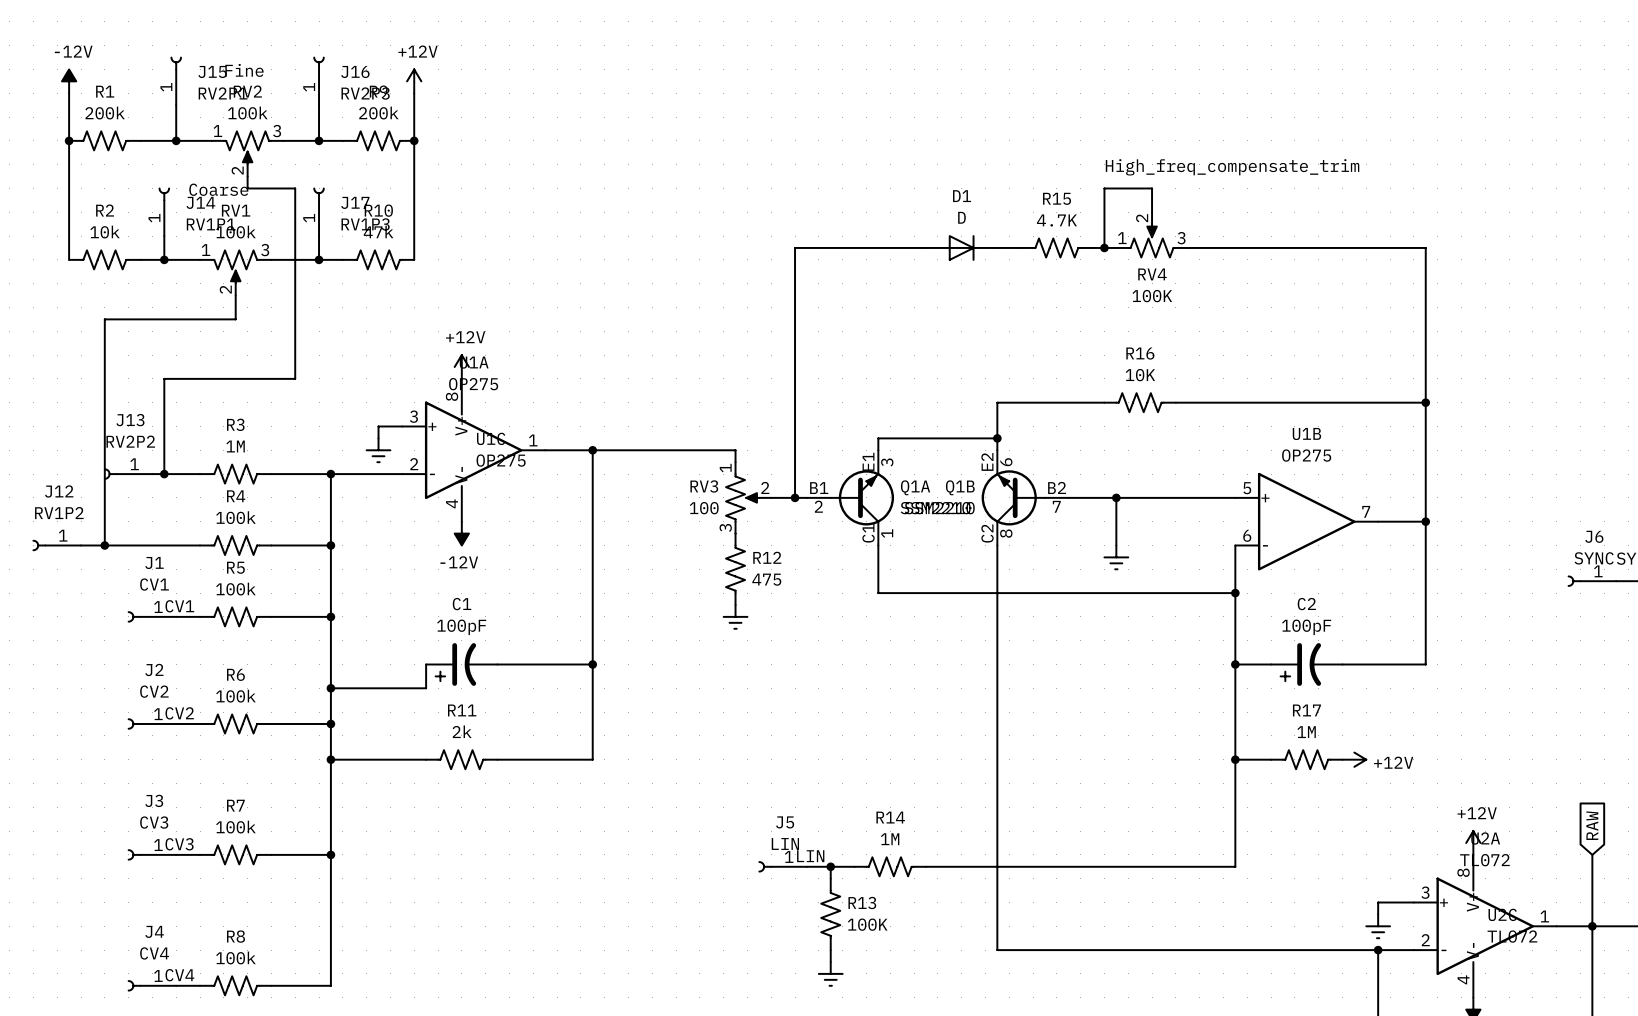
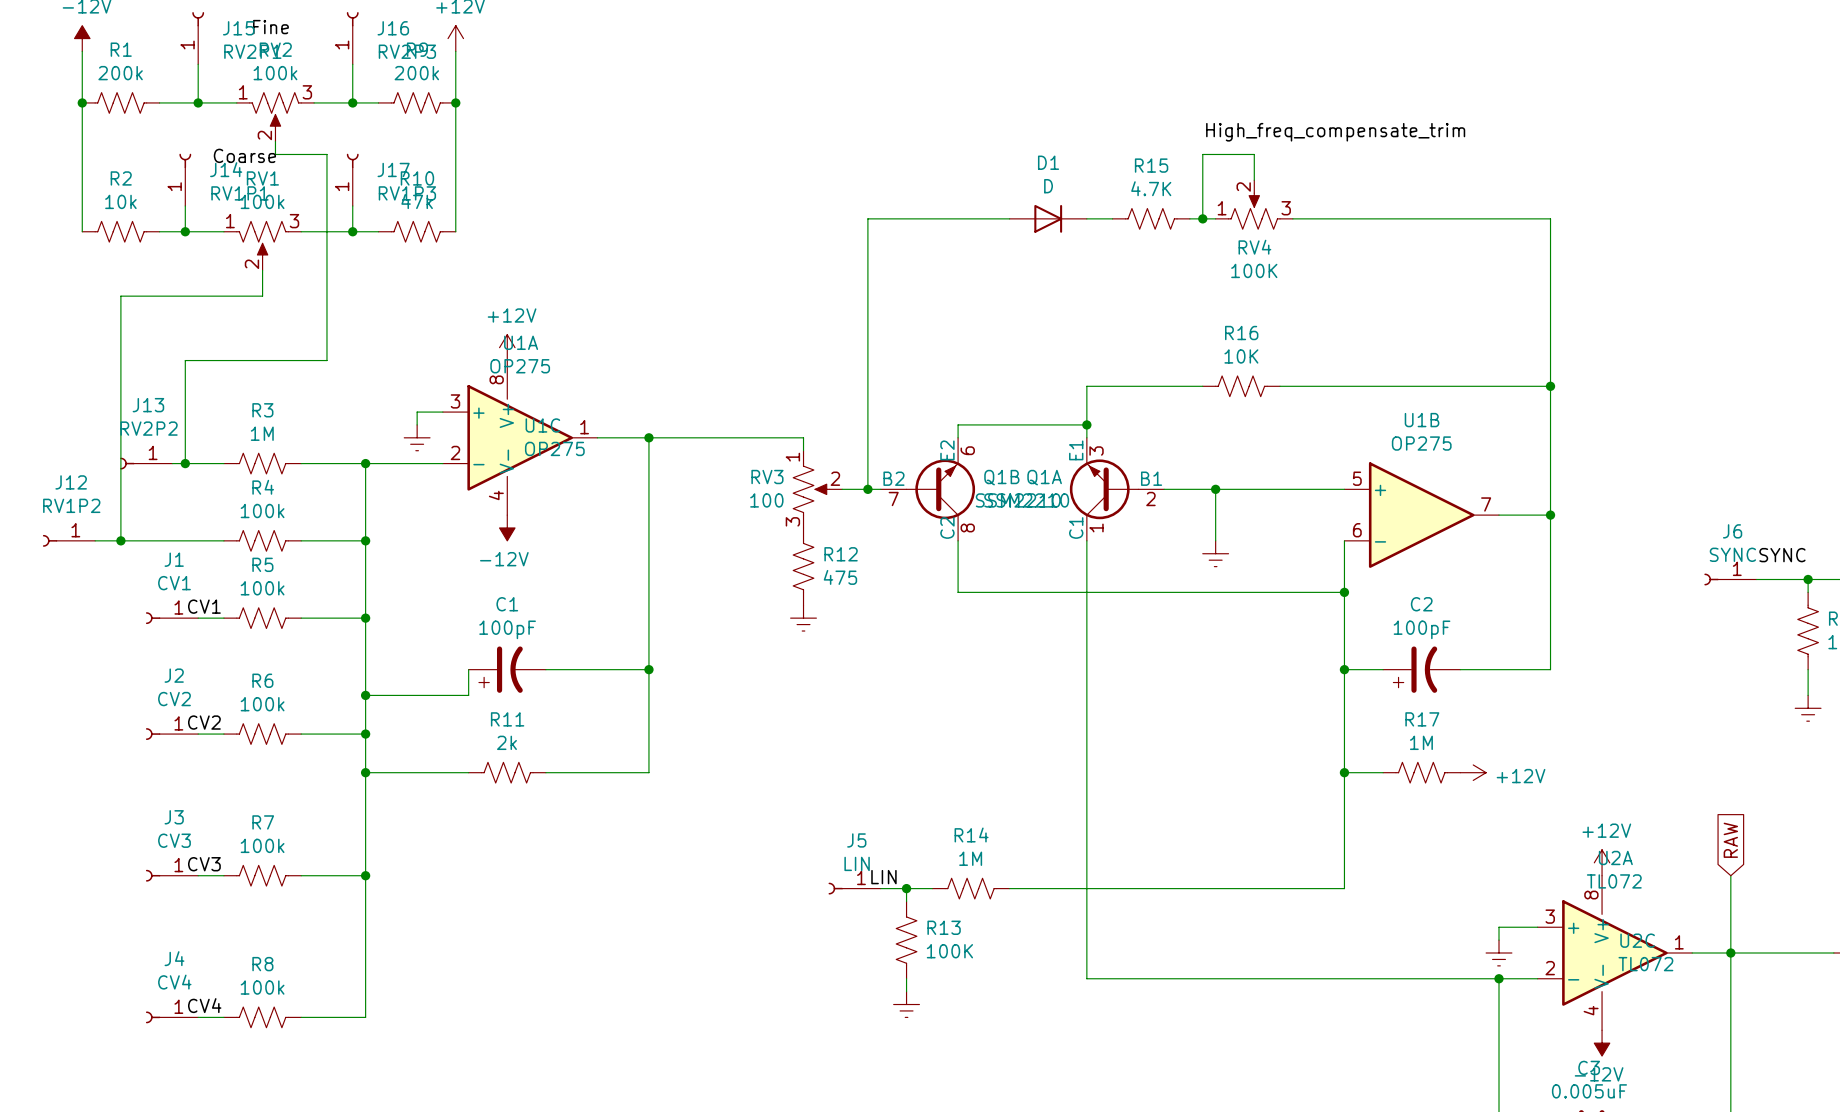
Q1A position: (850, 497) -> (1117, 489)
Q1A flip: as is (862, 497) -> left-right (1104, 489)
Q1B flip: as is (1013, 497) -> left-right (940, 489)
Q1B position: (1025, 497) -> (927, 489)

